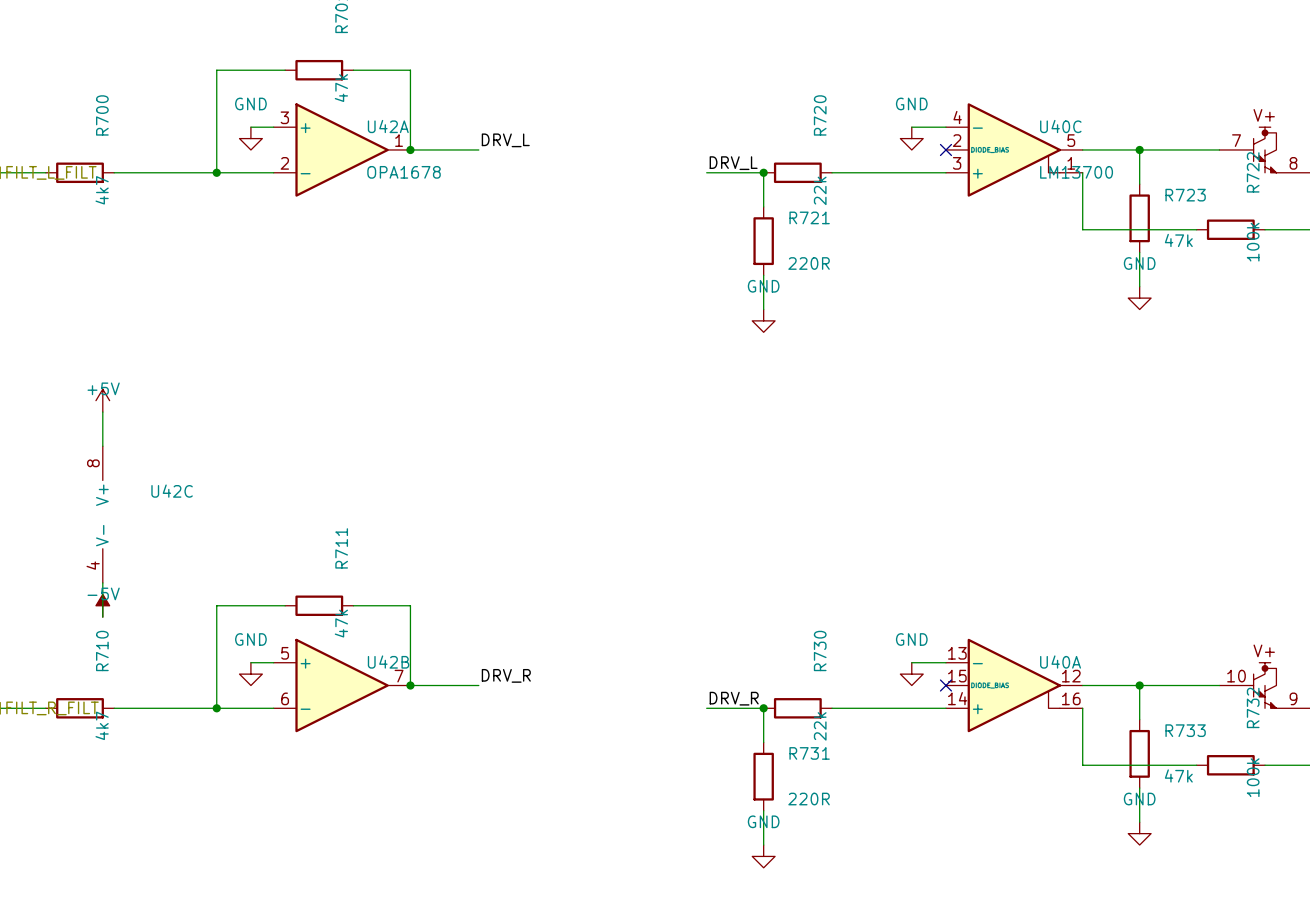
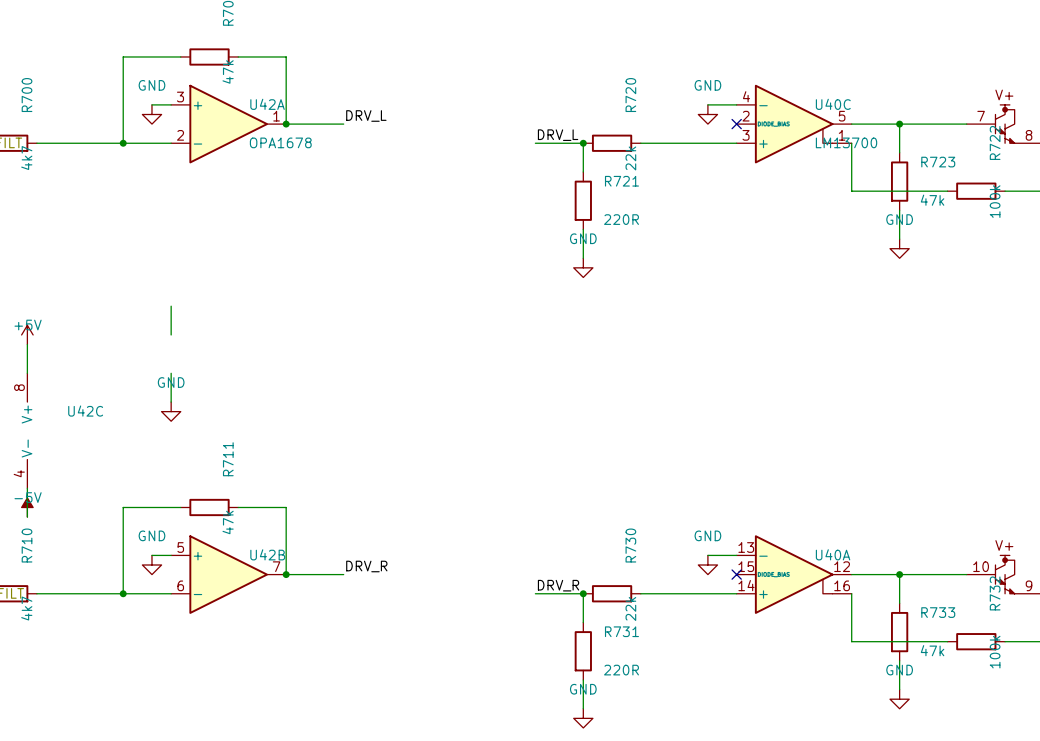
wire: none -> (171, 306) (171, 334)
wire: none -> (171, 373) (171, 402)
power symbol: none -> GND (171, 411)

